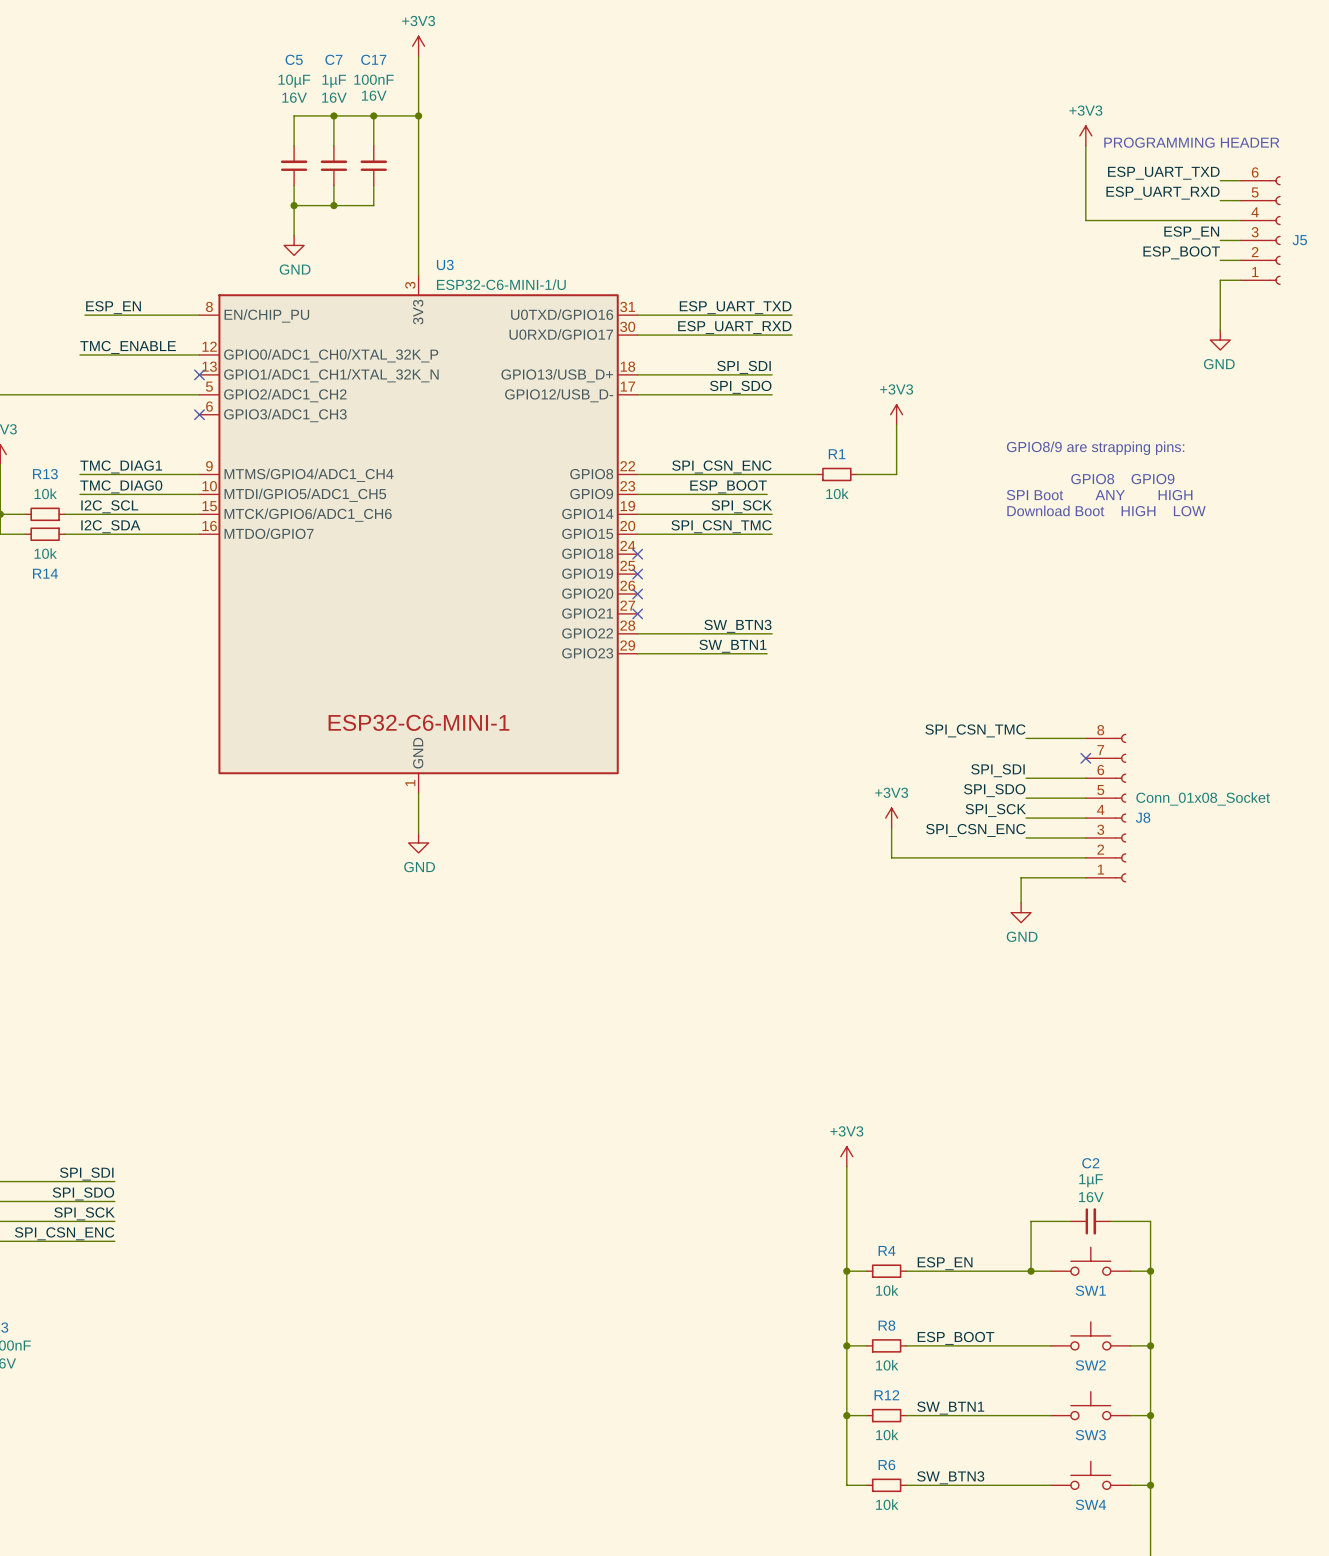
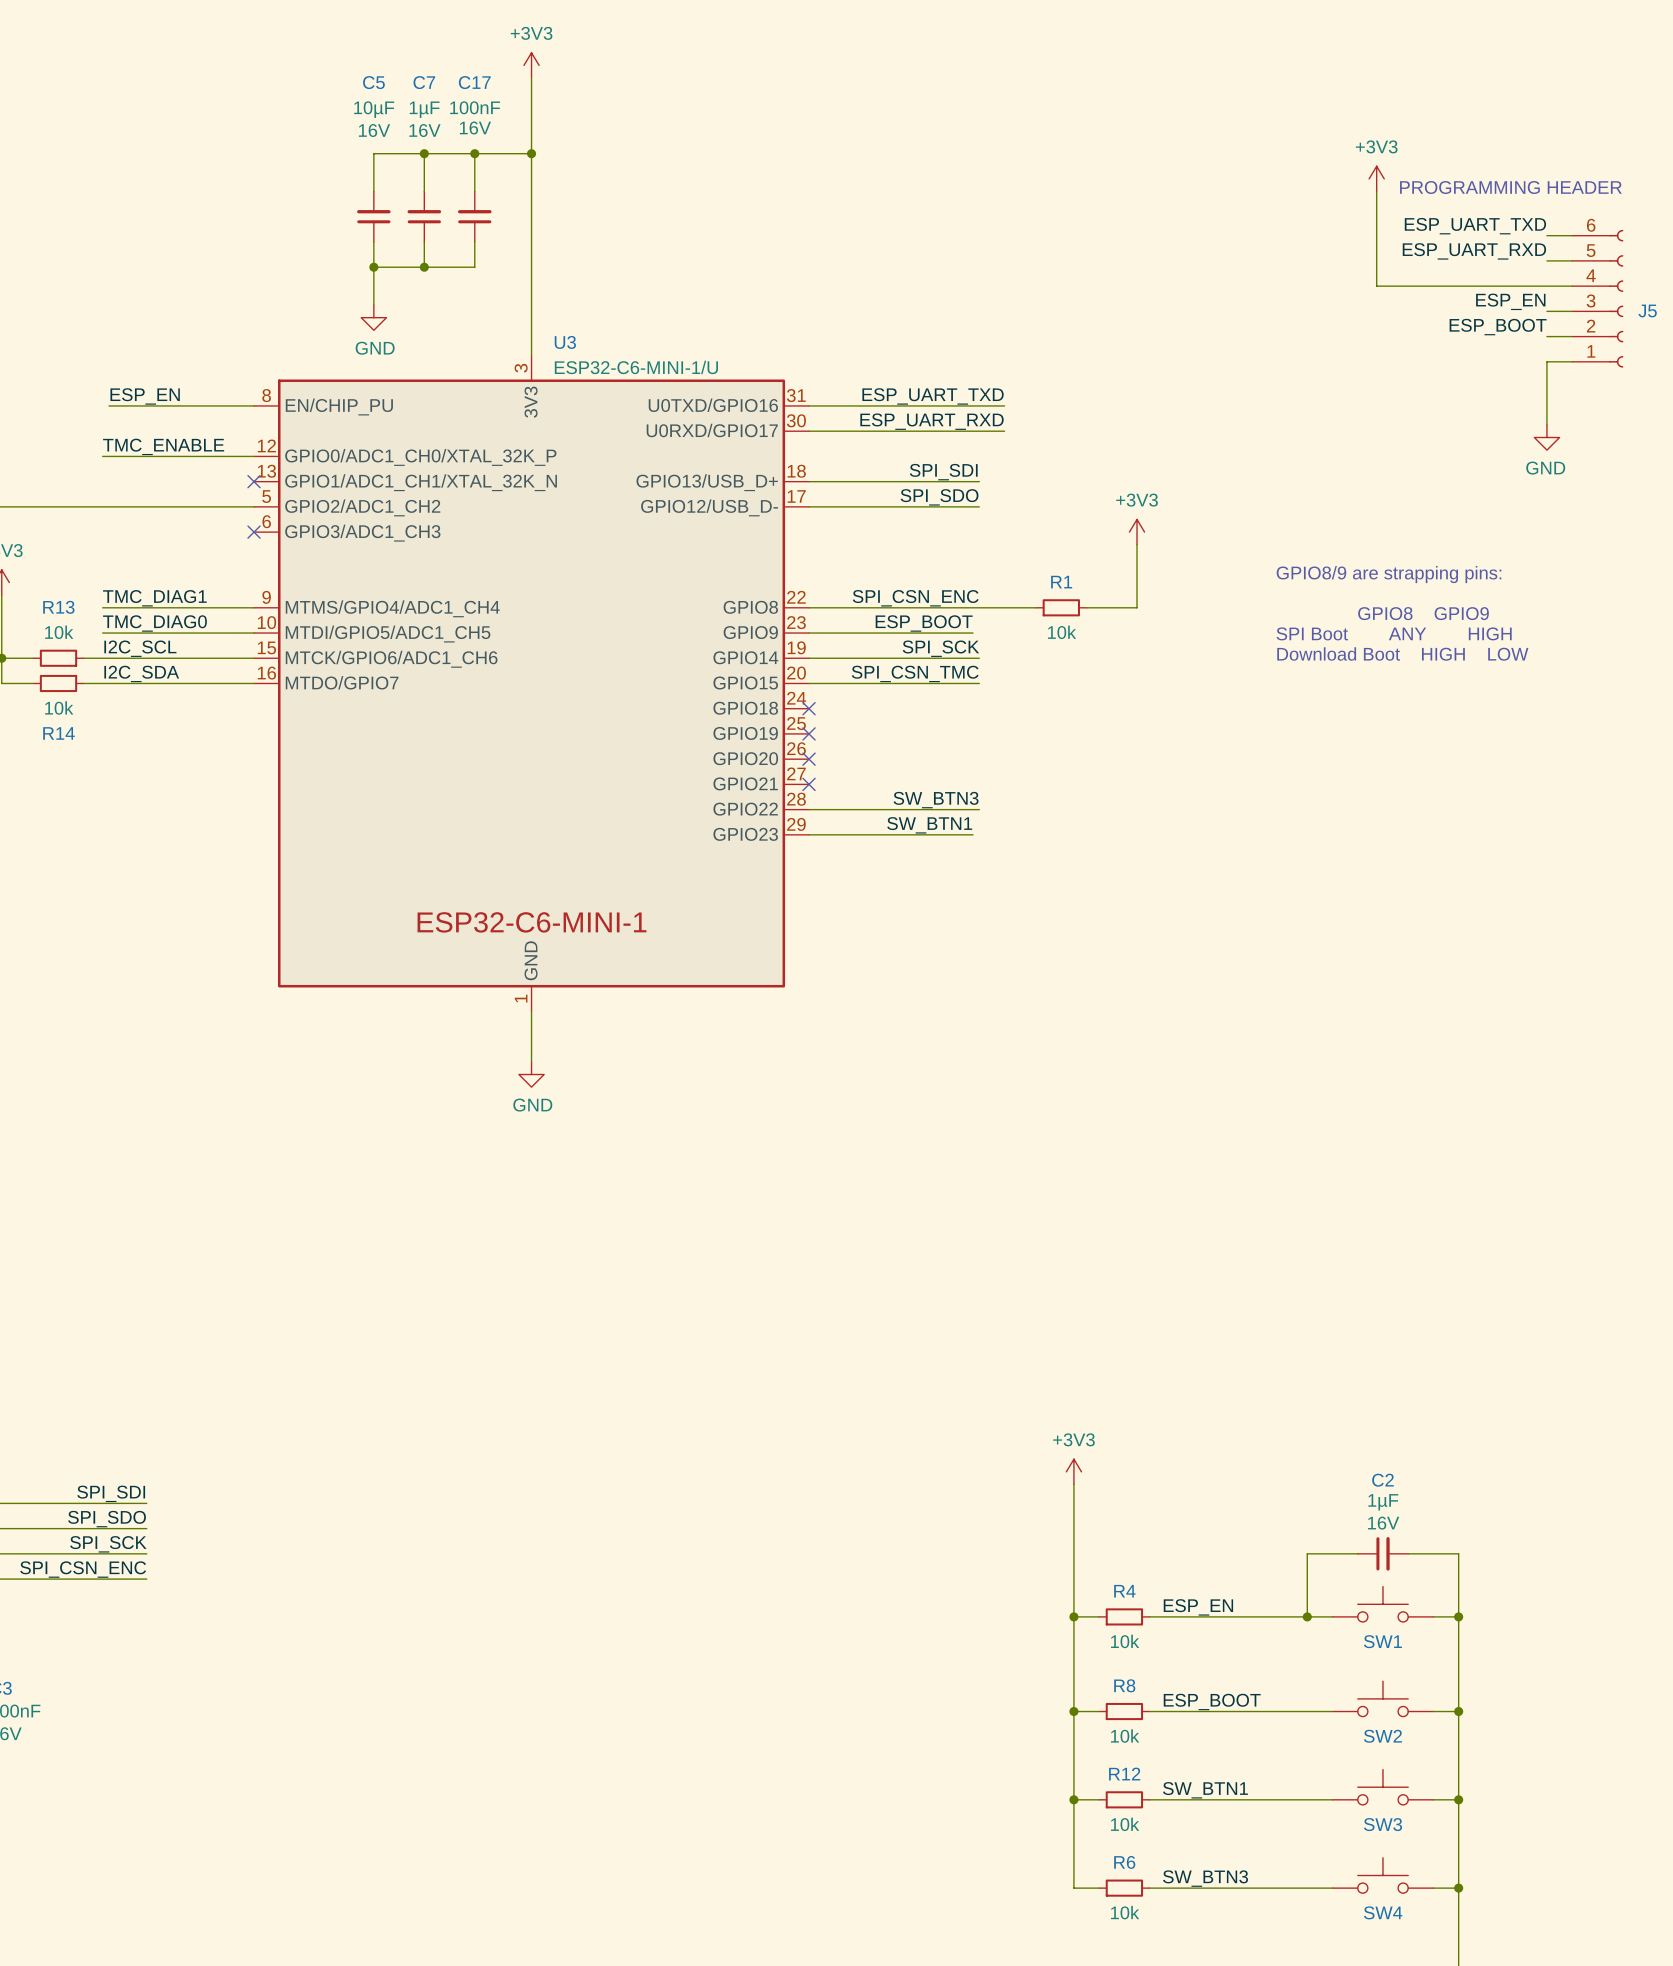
label: SPI_CSN_TMC (975, 730) -> none
wire: (1026, 738) (1085, 738) -> none
no-connect mark: (1085, 758) -> none
label: SPI_SDI (997, 770) -> none
wire: (1026, 778) (1085, 778) -> none
label: SPI_SDO (994, 790) -> none
wire: (1026, 798) (1085, 798) -> none
J8: Conn_01x08_Socket (1106, 808) -> none
label: SPI_SCK (995, 810) -> none
power symbol: +3V3 (891, 818) -> none
wire: (1026, 818) (1085, 818) -> none
wire: (891, 828) (891, 857) (1085, 857) -> none
label: SPI_CSN_ENC (975, 830) -> none
wire: (1026, 837) (1085, 837) -> none
wire: (1085, 877) (1021, 877) (1021, 902) -> none
power symbol: GND (1021, 912) -> none

